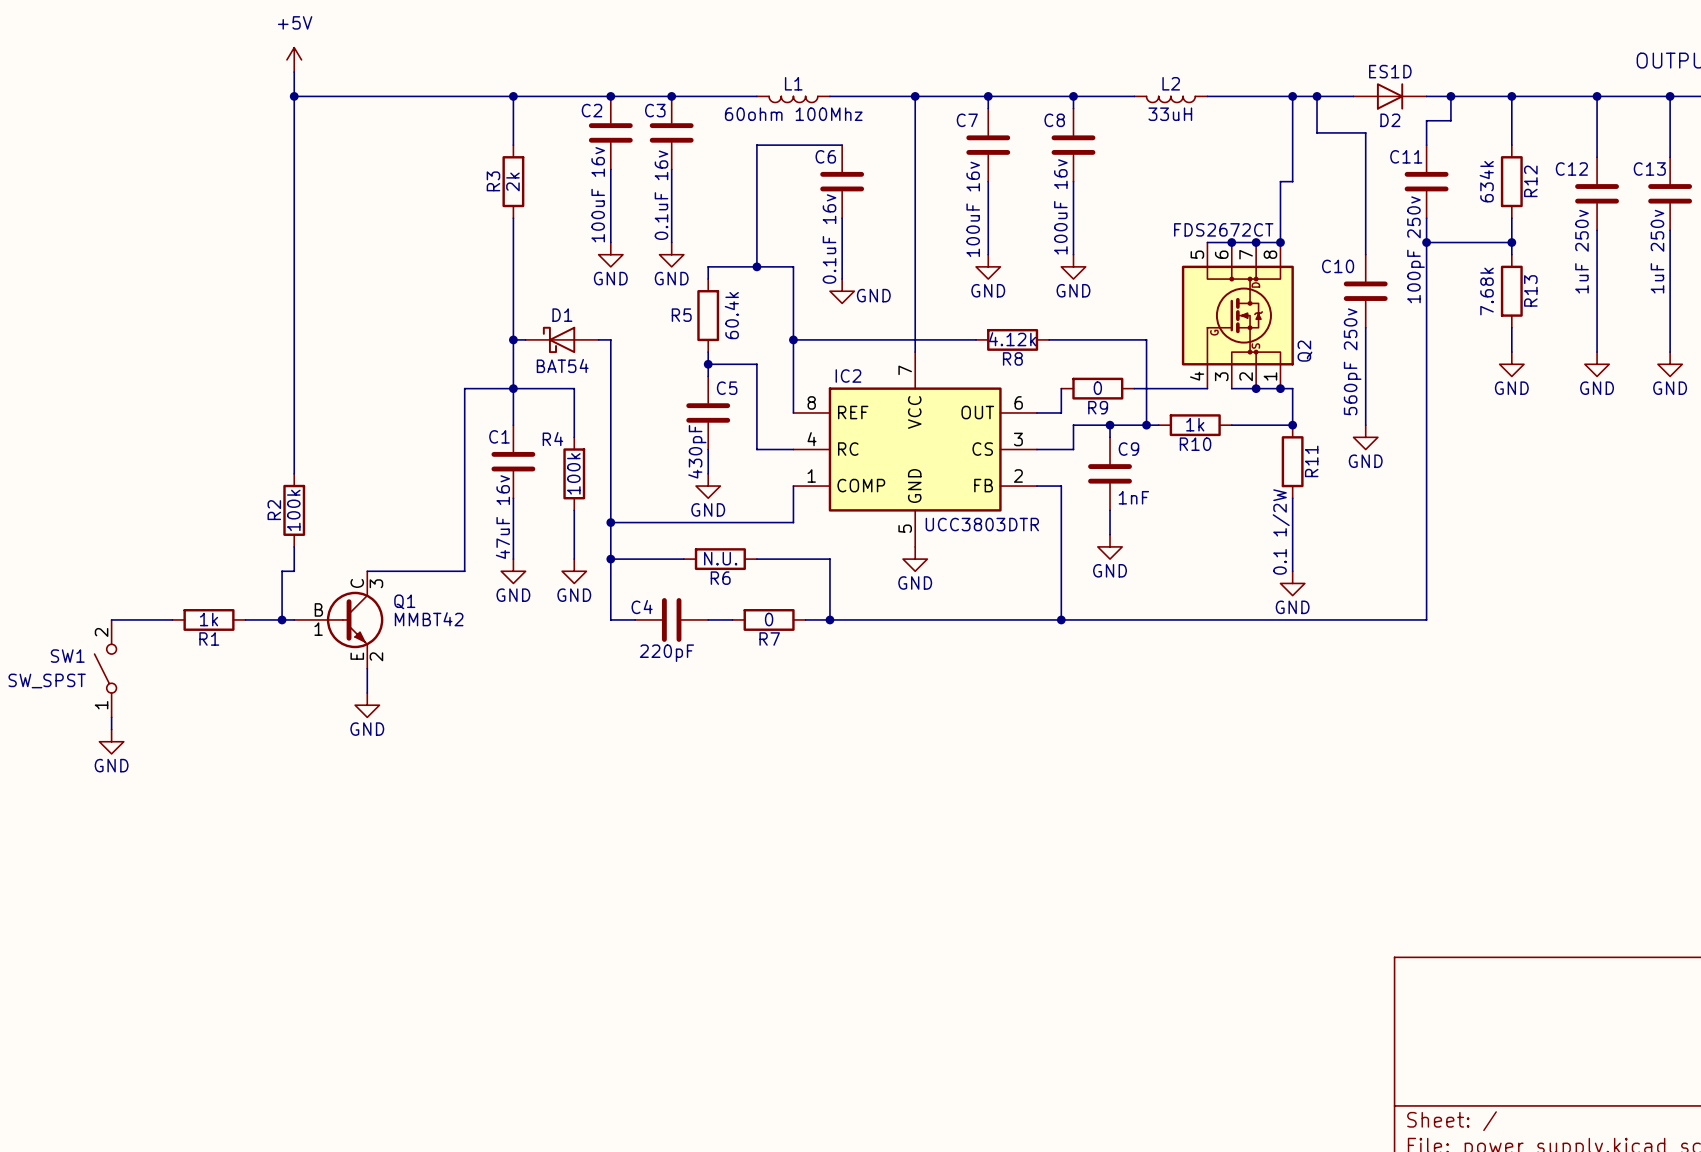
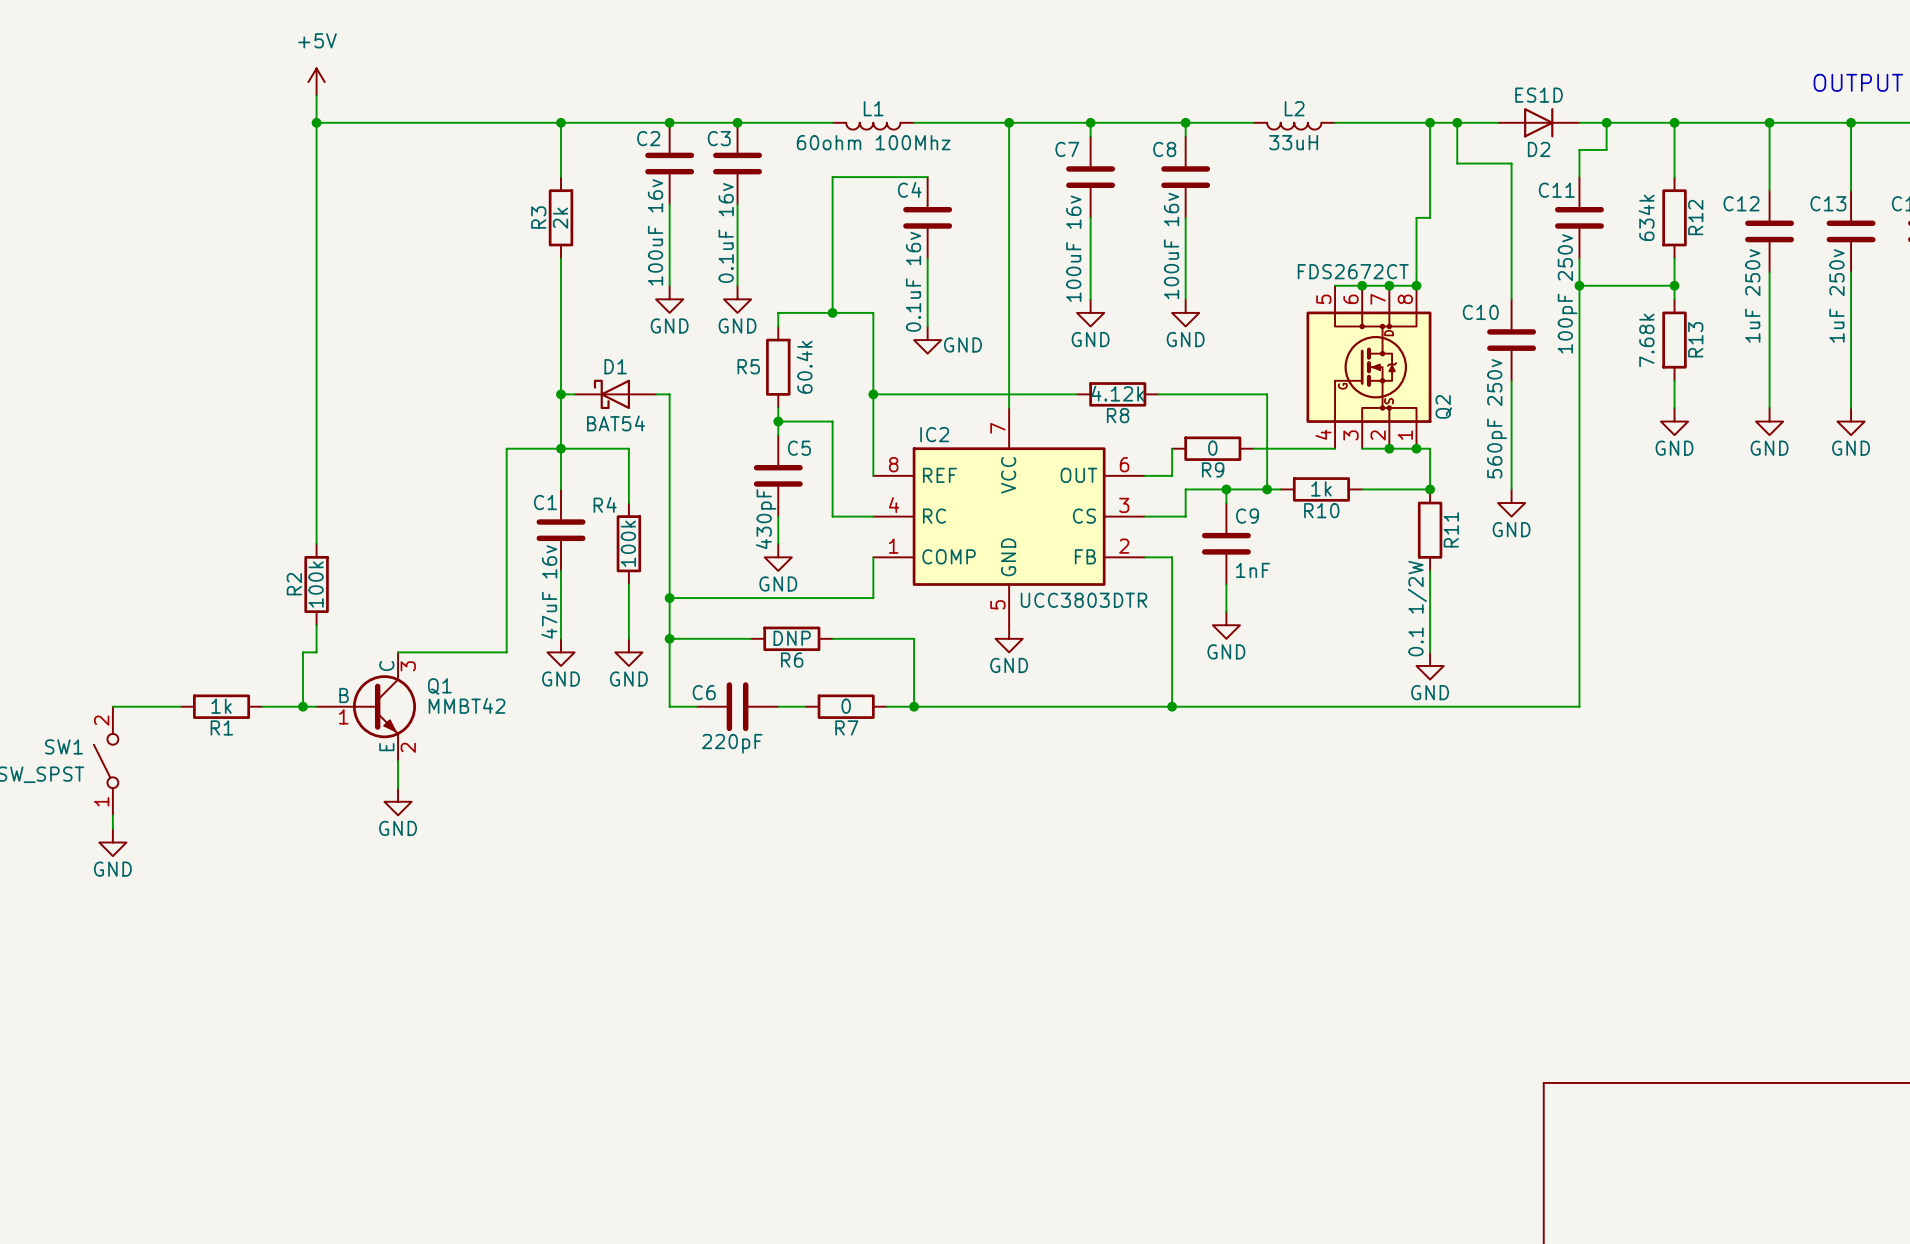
C6 name: C6 (825, 156) -> C4 (909, 189)
R6 value: N.U. (720, 558) -> DNP (792, 638)
C4 name: C4 (642, 607) -> C6 (704, 692)

